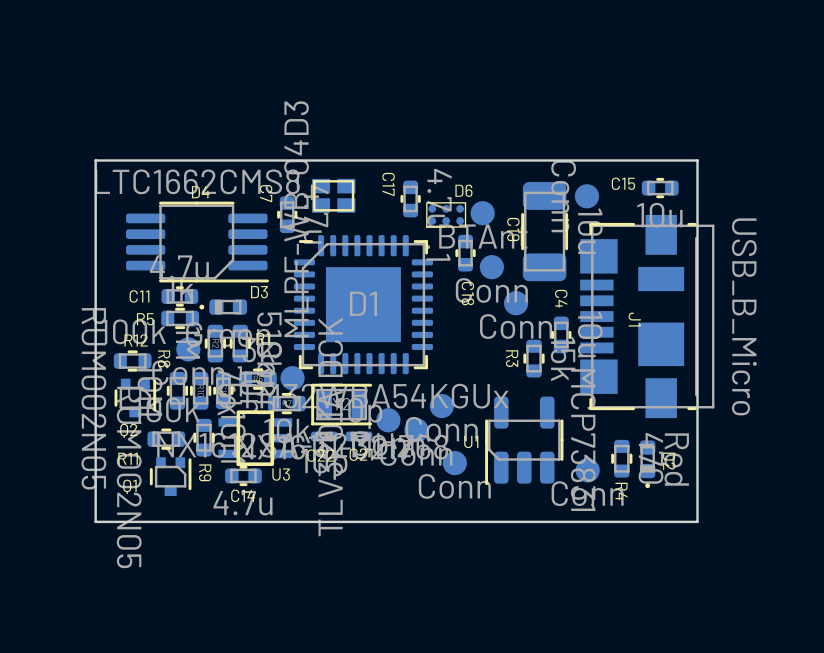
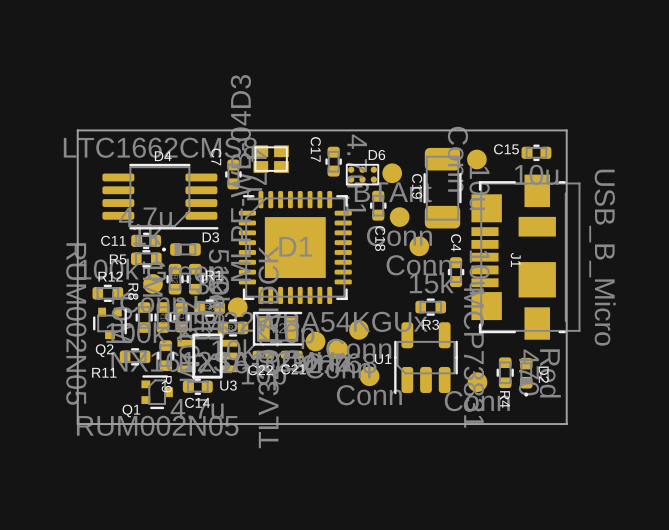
R3 rotation: 0° (533, 358) -> 90° clockwise (430, 307)
Q1 rotation: 0° (170, 476) -> 90° counterclockwise (157, 392)

